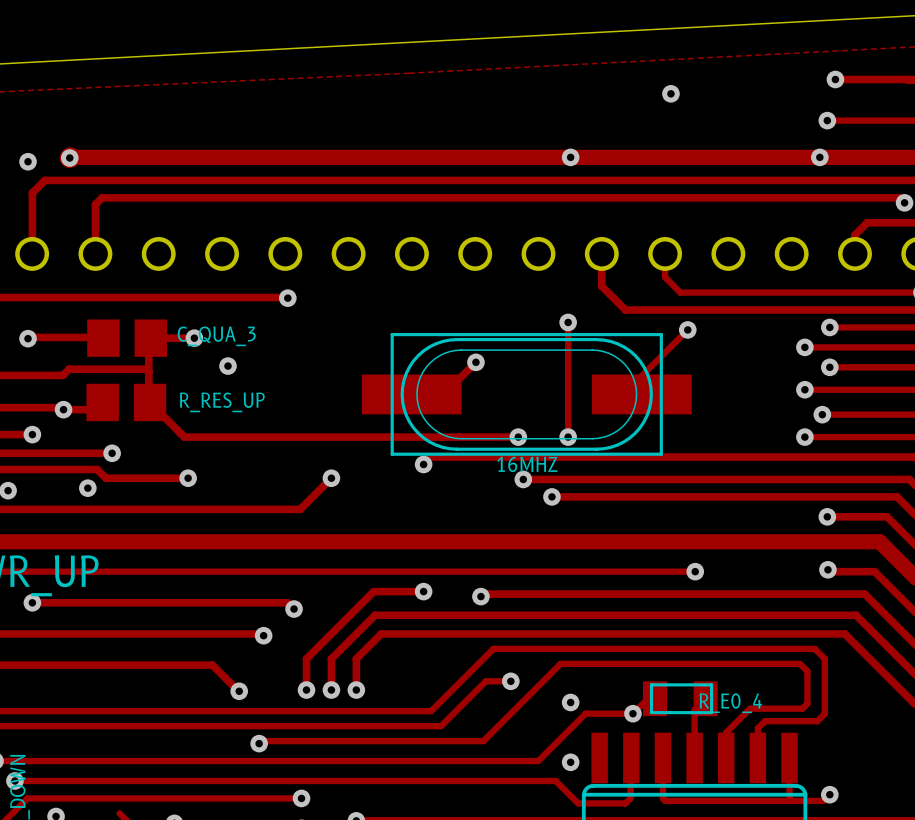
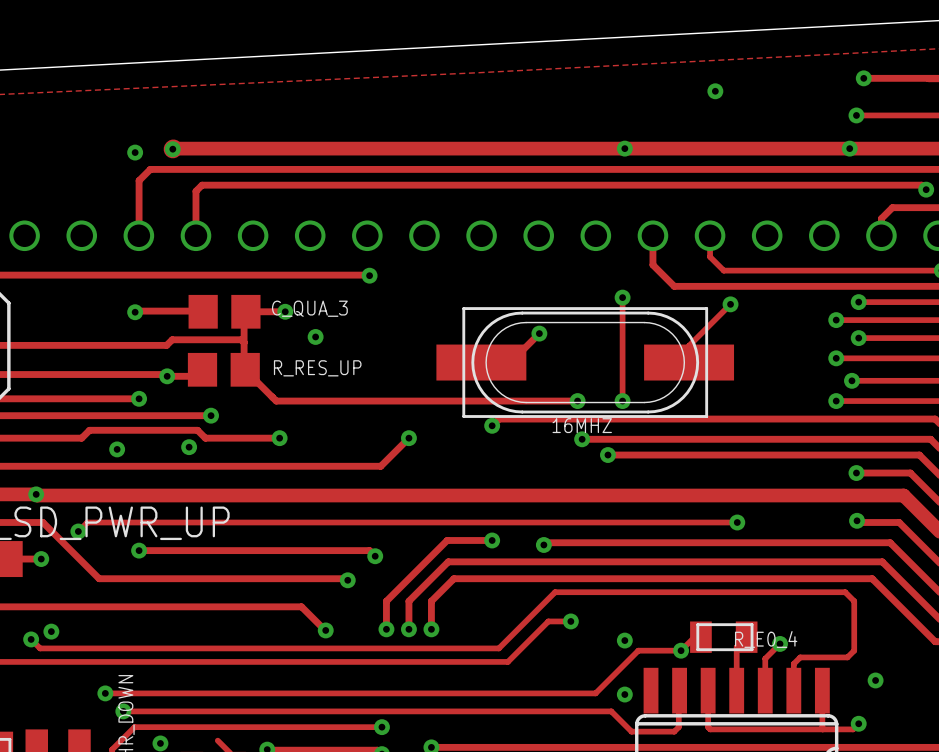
via: none -> (780, 643)
track: (726, 732) (750, 708) (802, 708) (807, 703) (807, 671) (799, 663) (560, 663) (483, 741) (261, 741) (259, 743) -> (765, 667) (765, 658) (780, 643)
via: (259, 743) -> none
via: none -> (875, 680)

